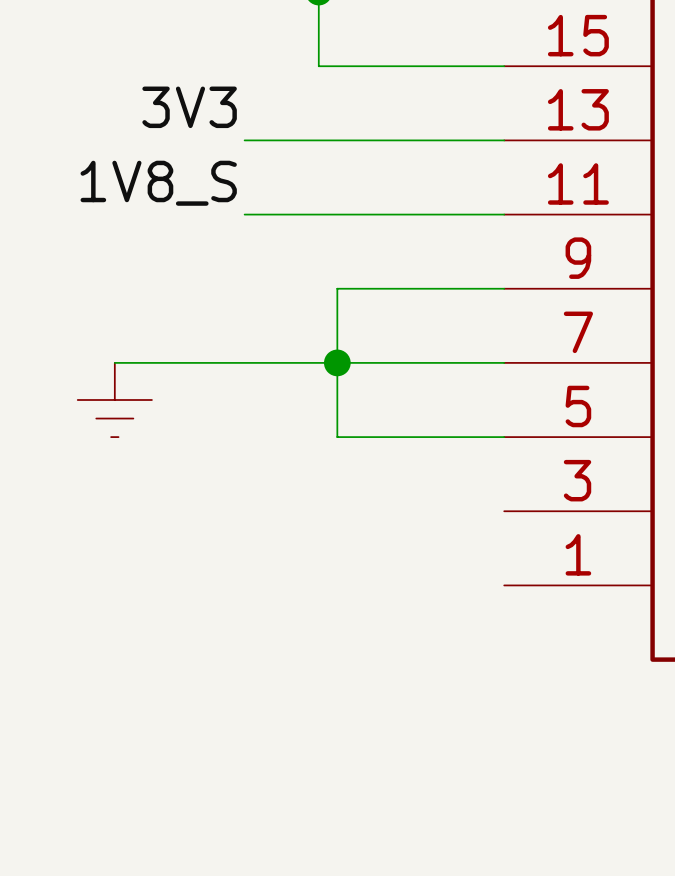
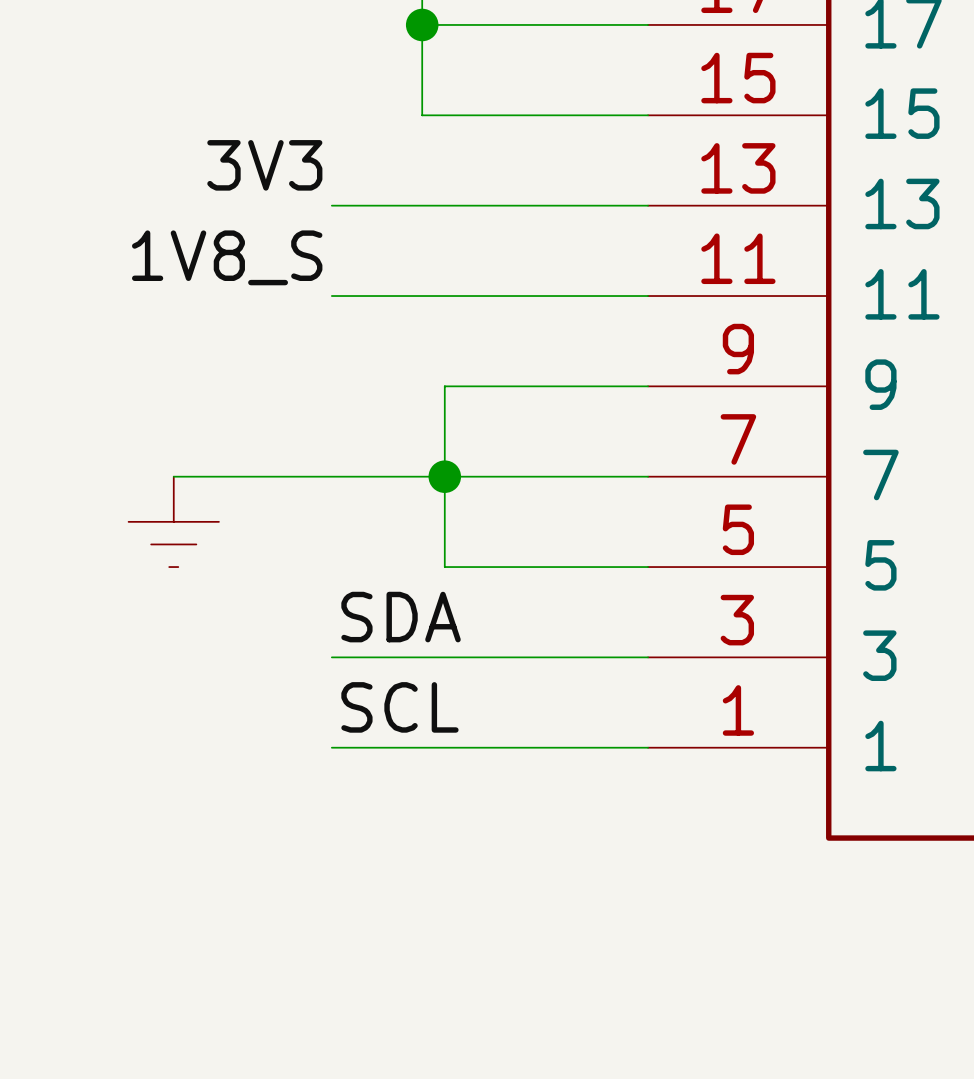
label: none -> SDA (401, 617)
wire: none -> (331, 657) (648, 657)
label: none -> SCL (399, 707)
wire: none -> (331, 747) (648, 747)

